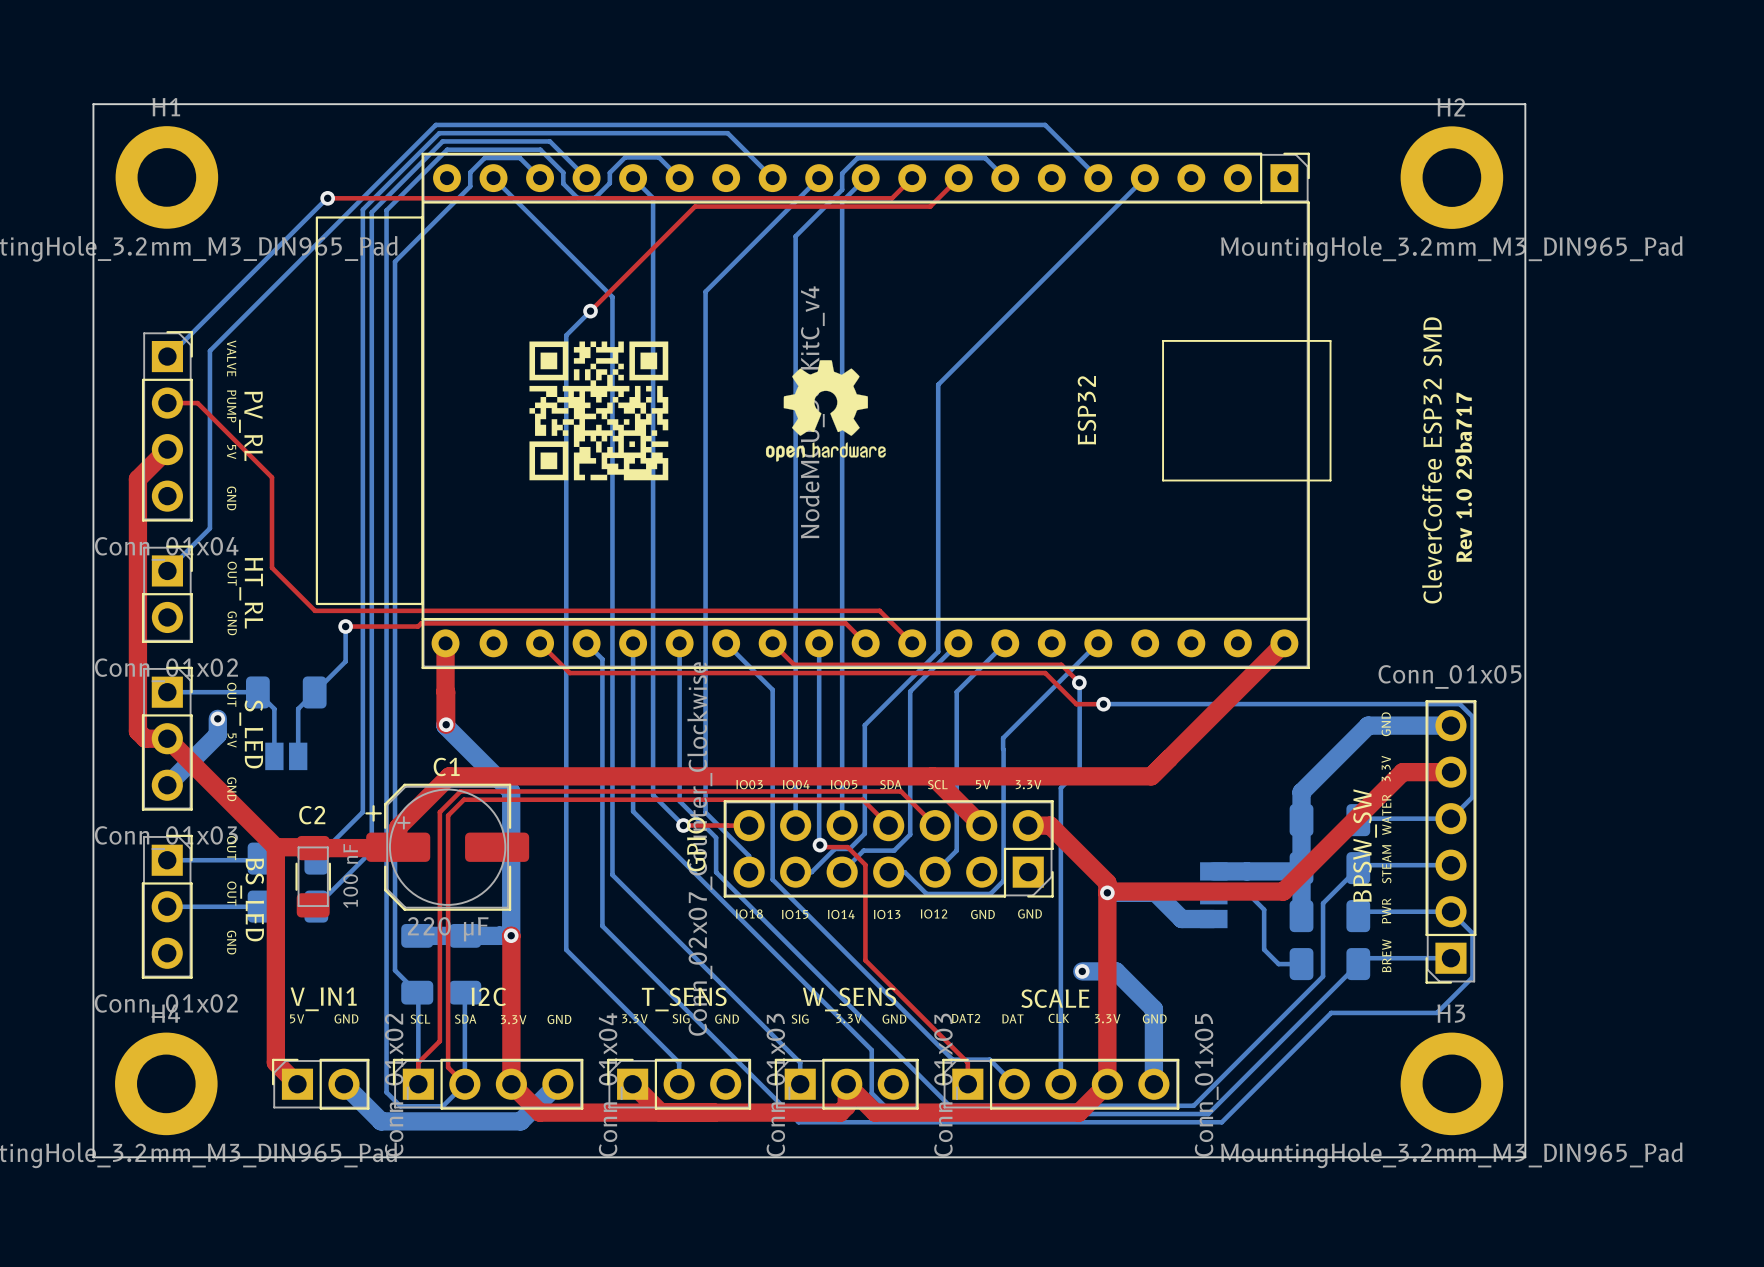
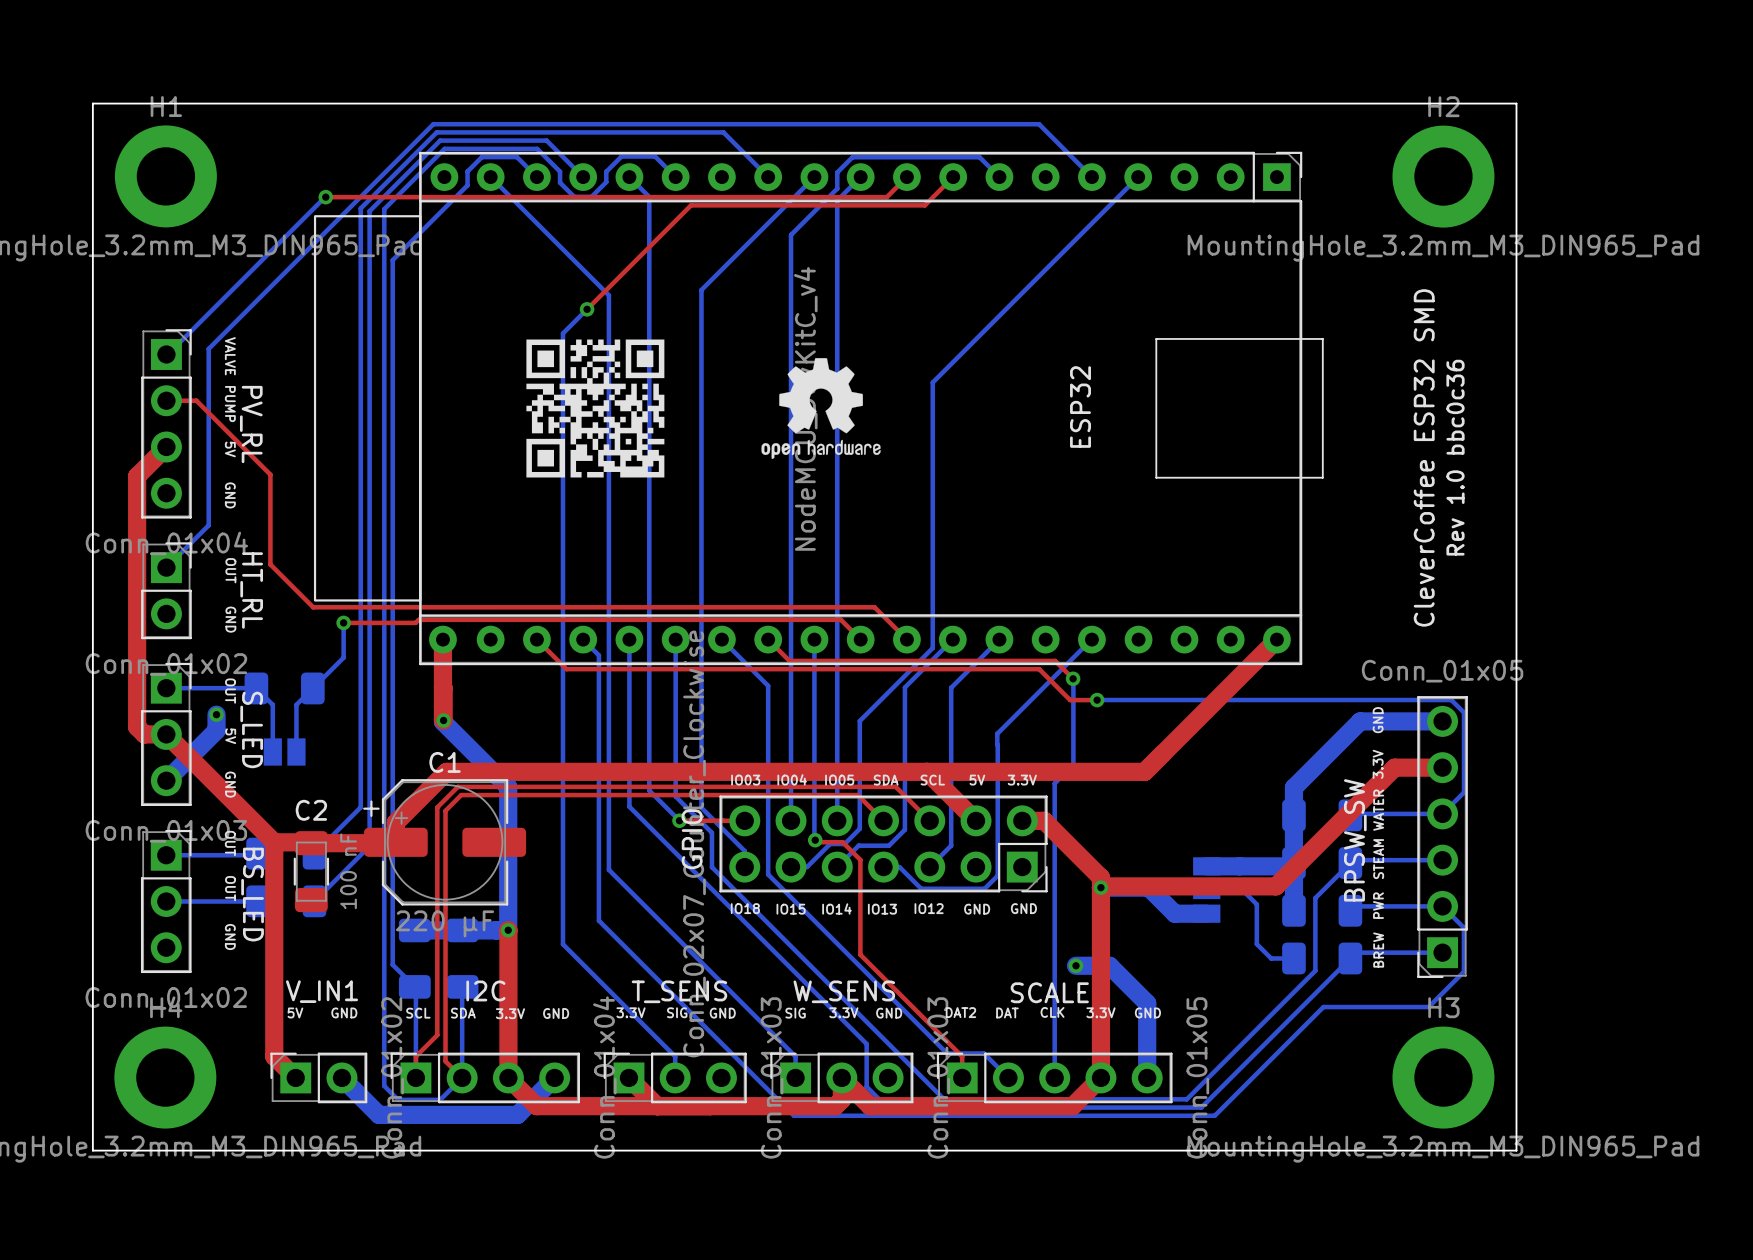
text: Rev 1.0 29ba717 (1463, 477) -> Rev 1.0 bbc0c36 (1455, 457)

